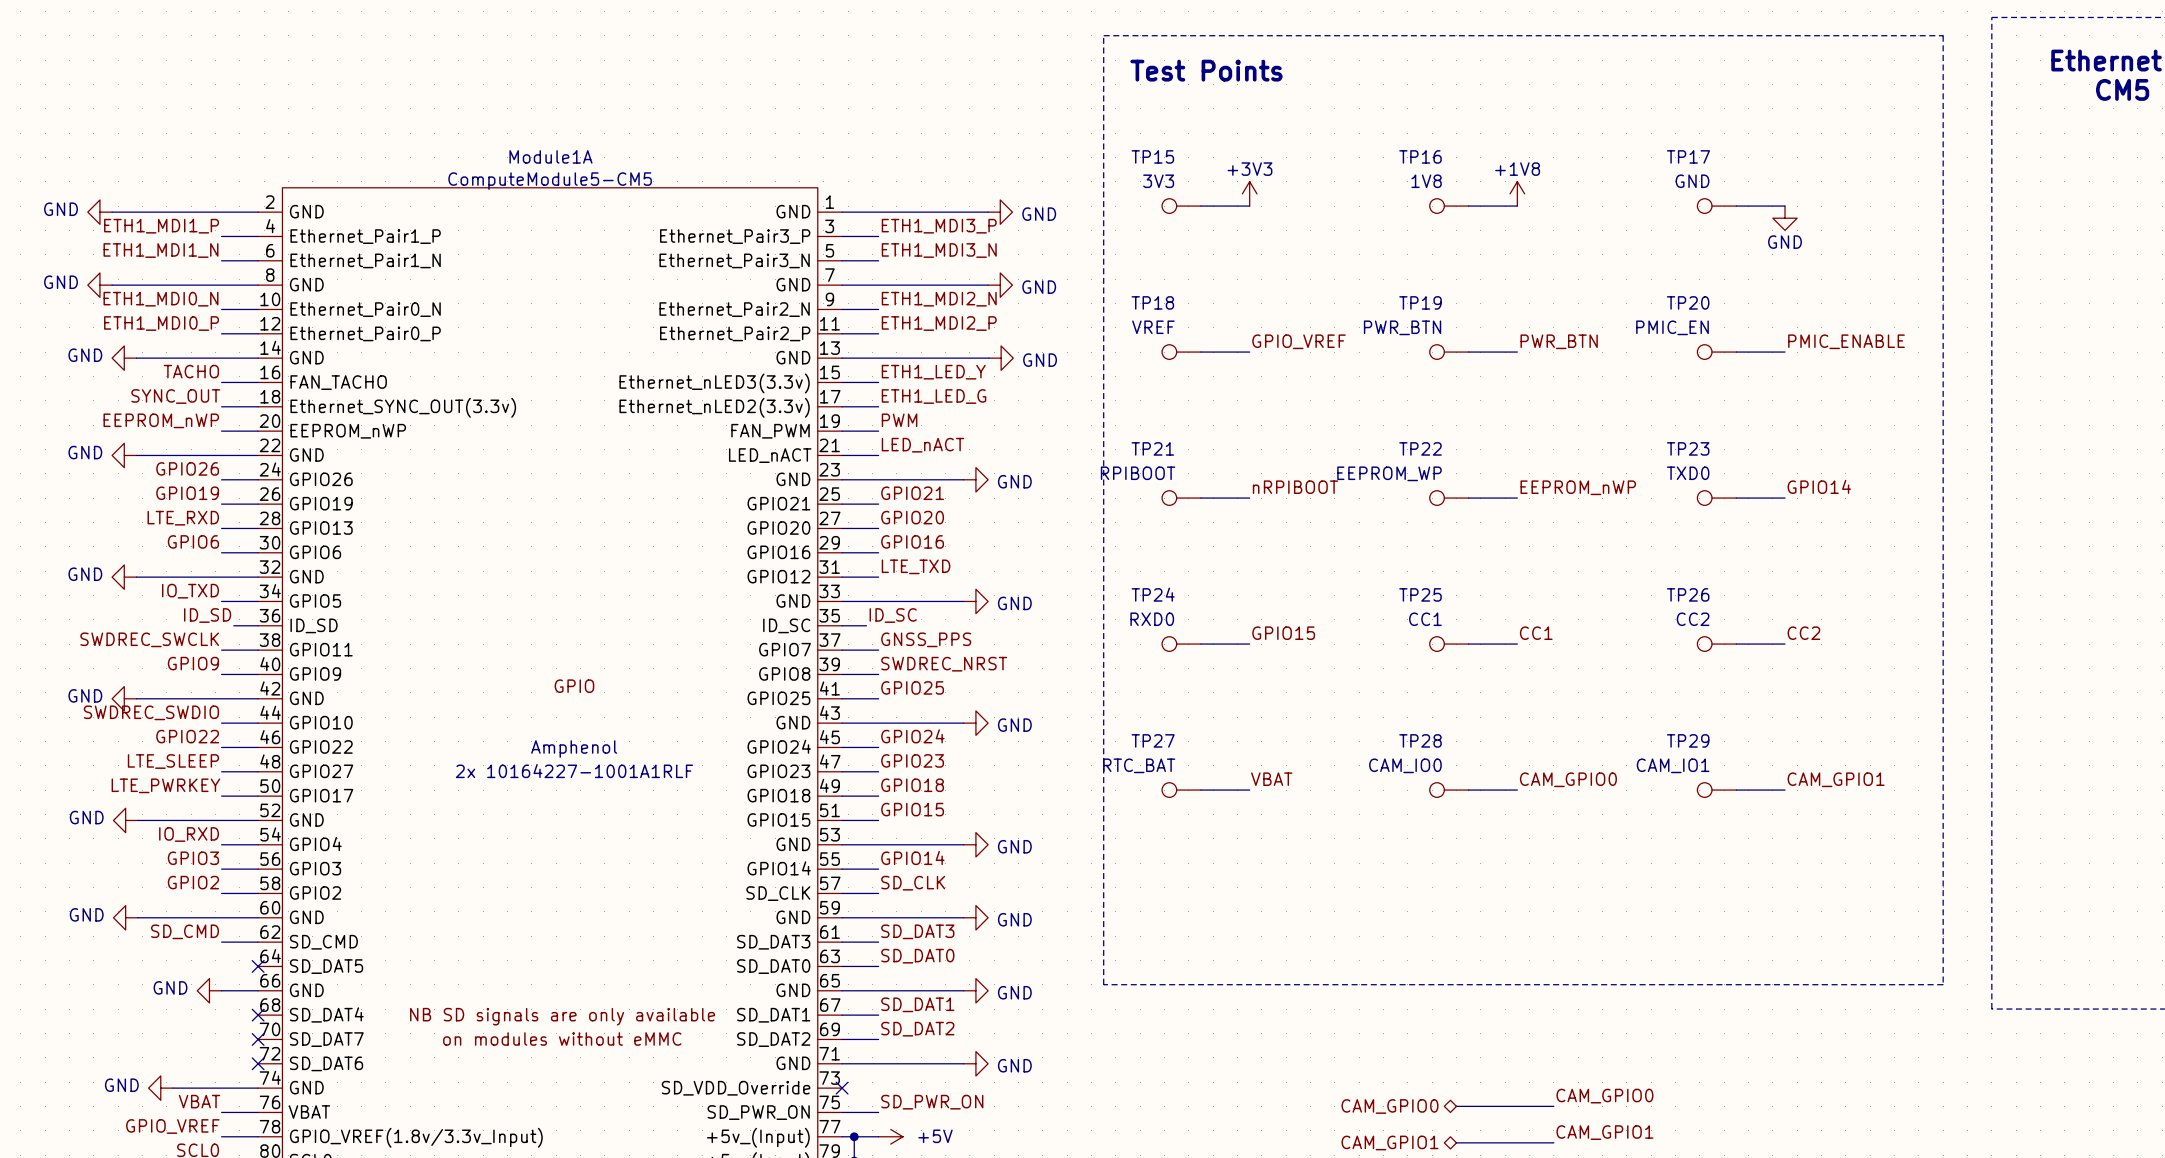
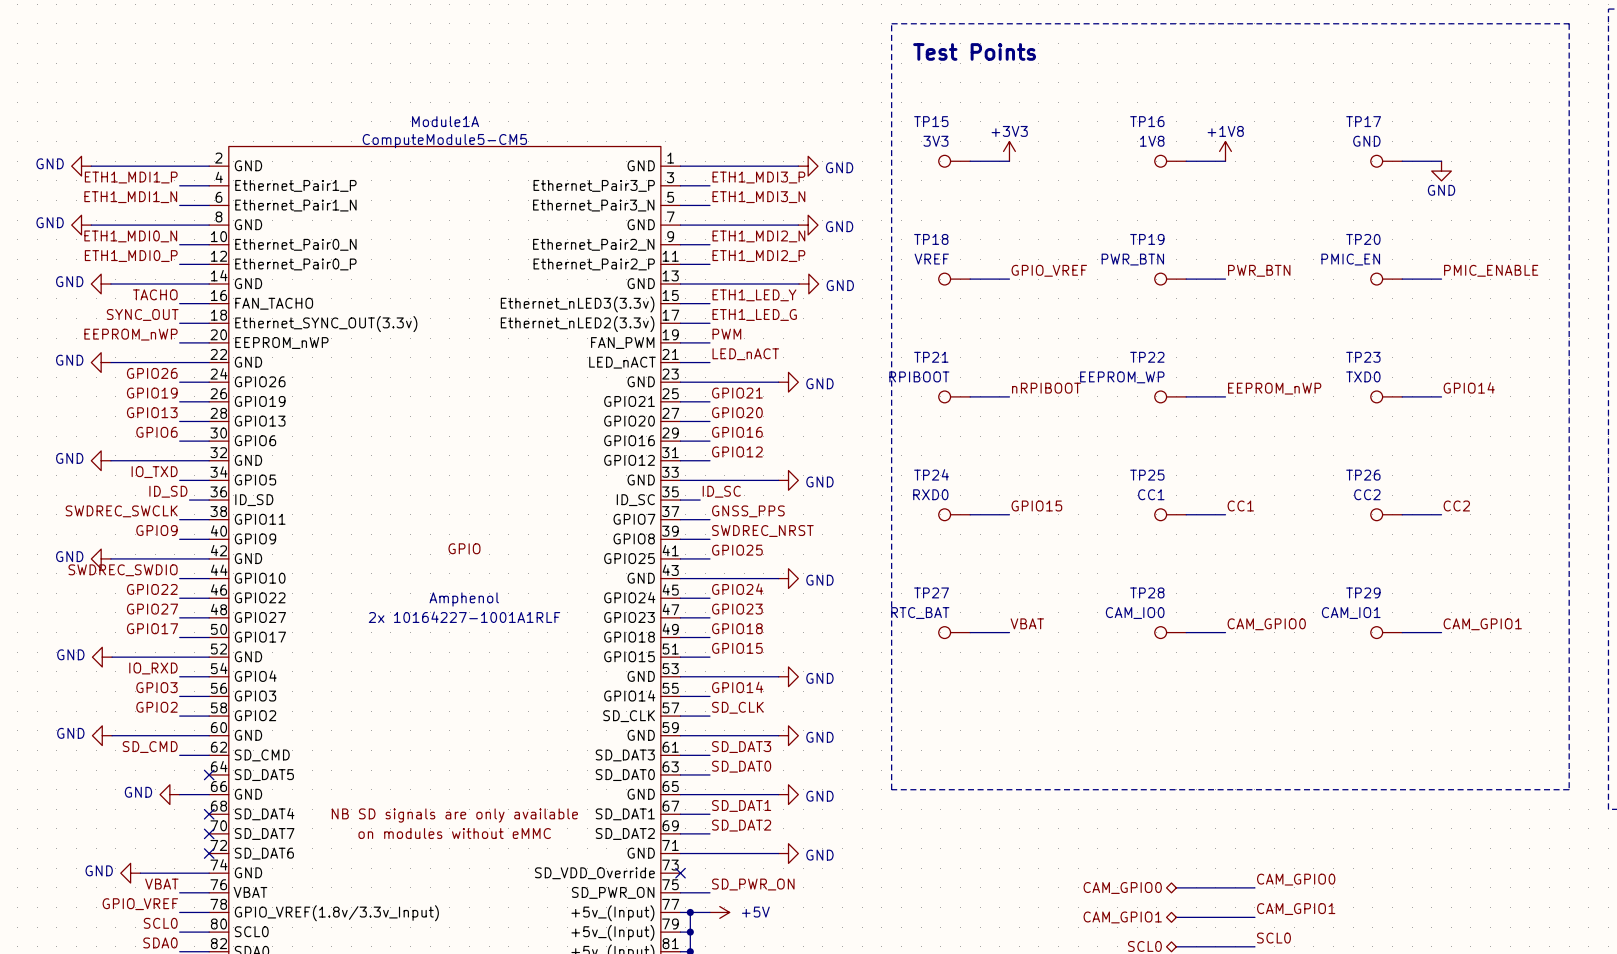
label: LTE_RXD (183, 518) -> GPIO13 (152, 412)
label: LTE_TXD (916, 566) -> GPIO12 (737, 451)
label: LTE_SLEEP (173, 761) -> GPIO27 (152, 609)
label: LTE_PWRKEY (165, 785) -> GPIO17 (152, 628)

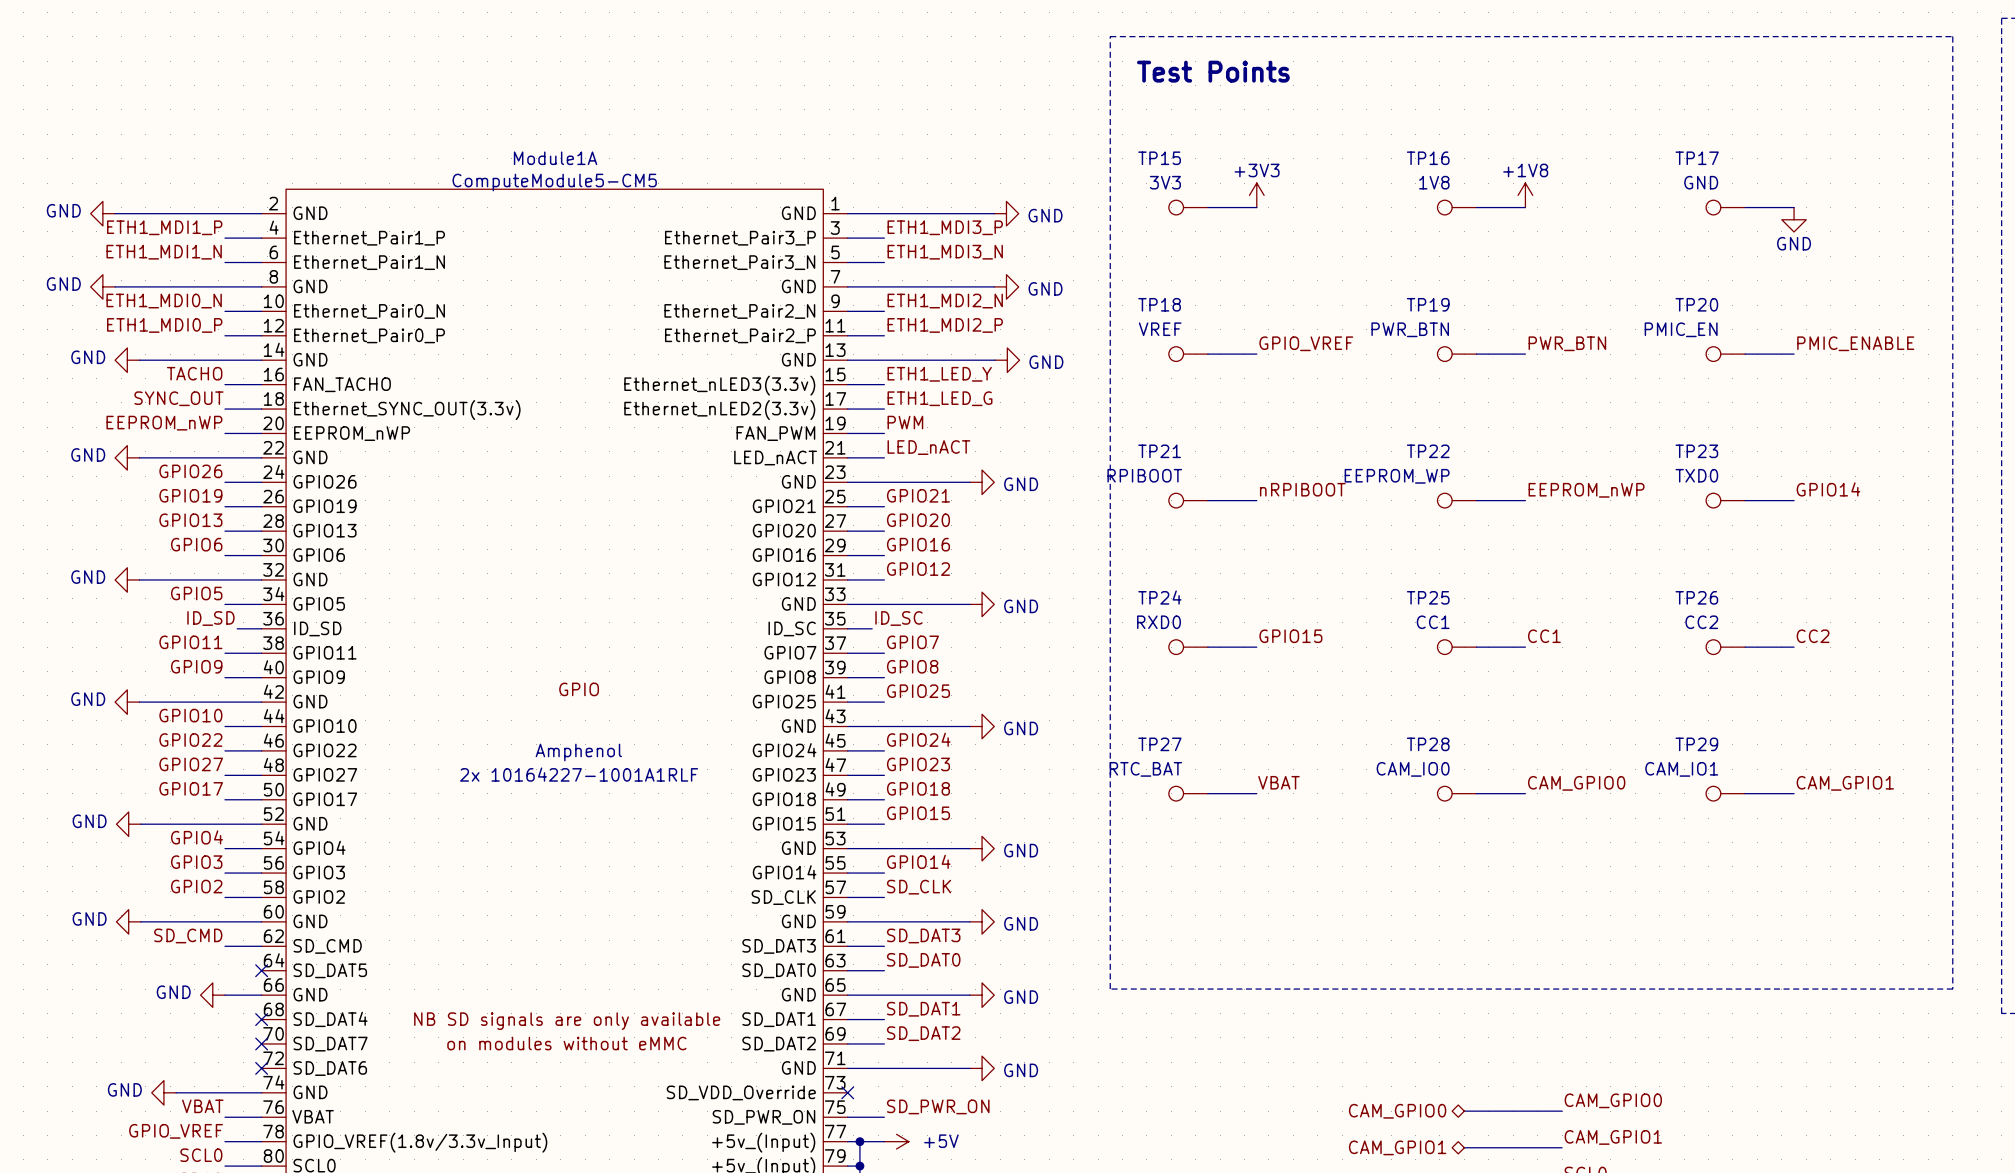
label: IO_TXD (154, 472) -> GPIO5 (196, 593)
label: SWDREC_SWCLK (121, 511) -> GPIO11 (190, 642)
label: GNSS_PPS (748, 511) -> GPIO7 (912, 642)
label: SWDREC_NRST (762, 531) -> GPIO8 (912, 666)
label: SWDREC_SWDIO (123, 570) -> GPIO10 (190, 715)
label: IO_RXD (153, 668) -> GPIO4 (196, 837)

